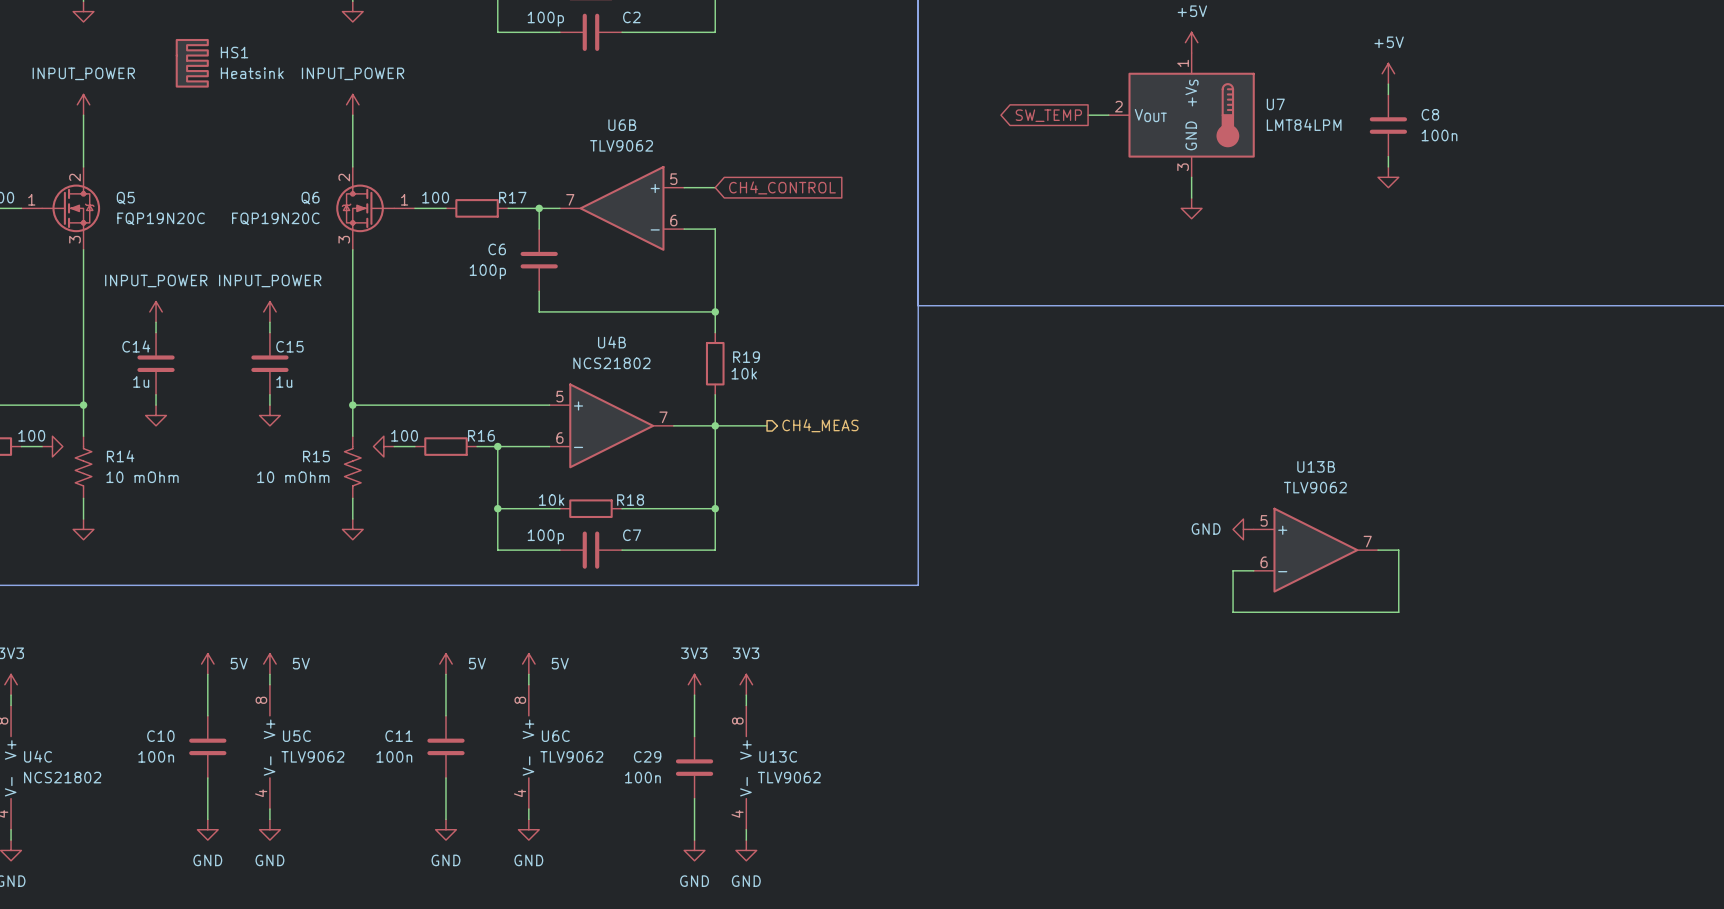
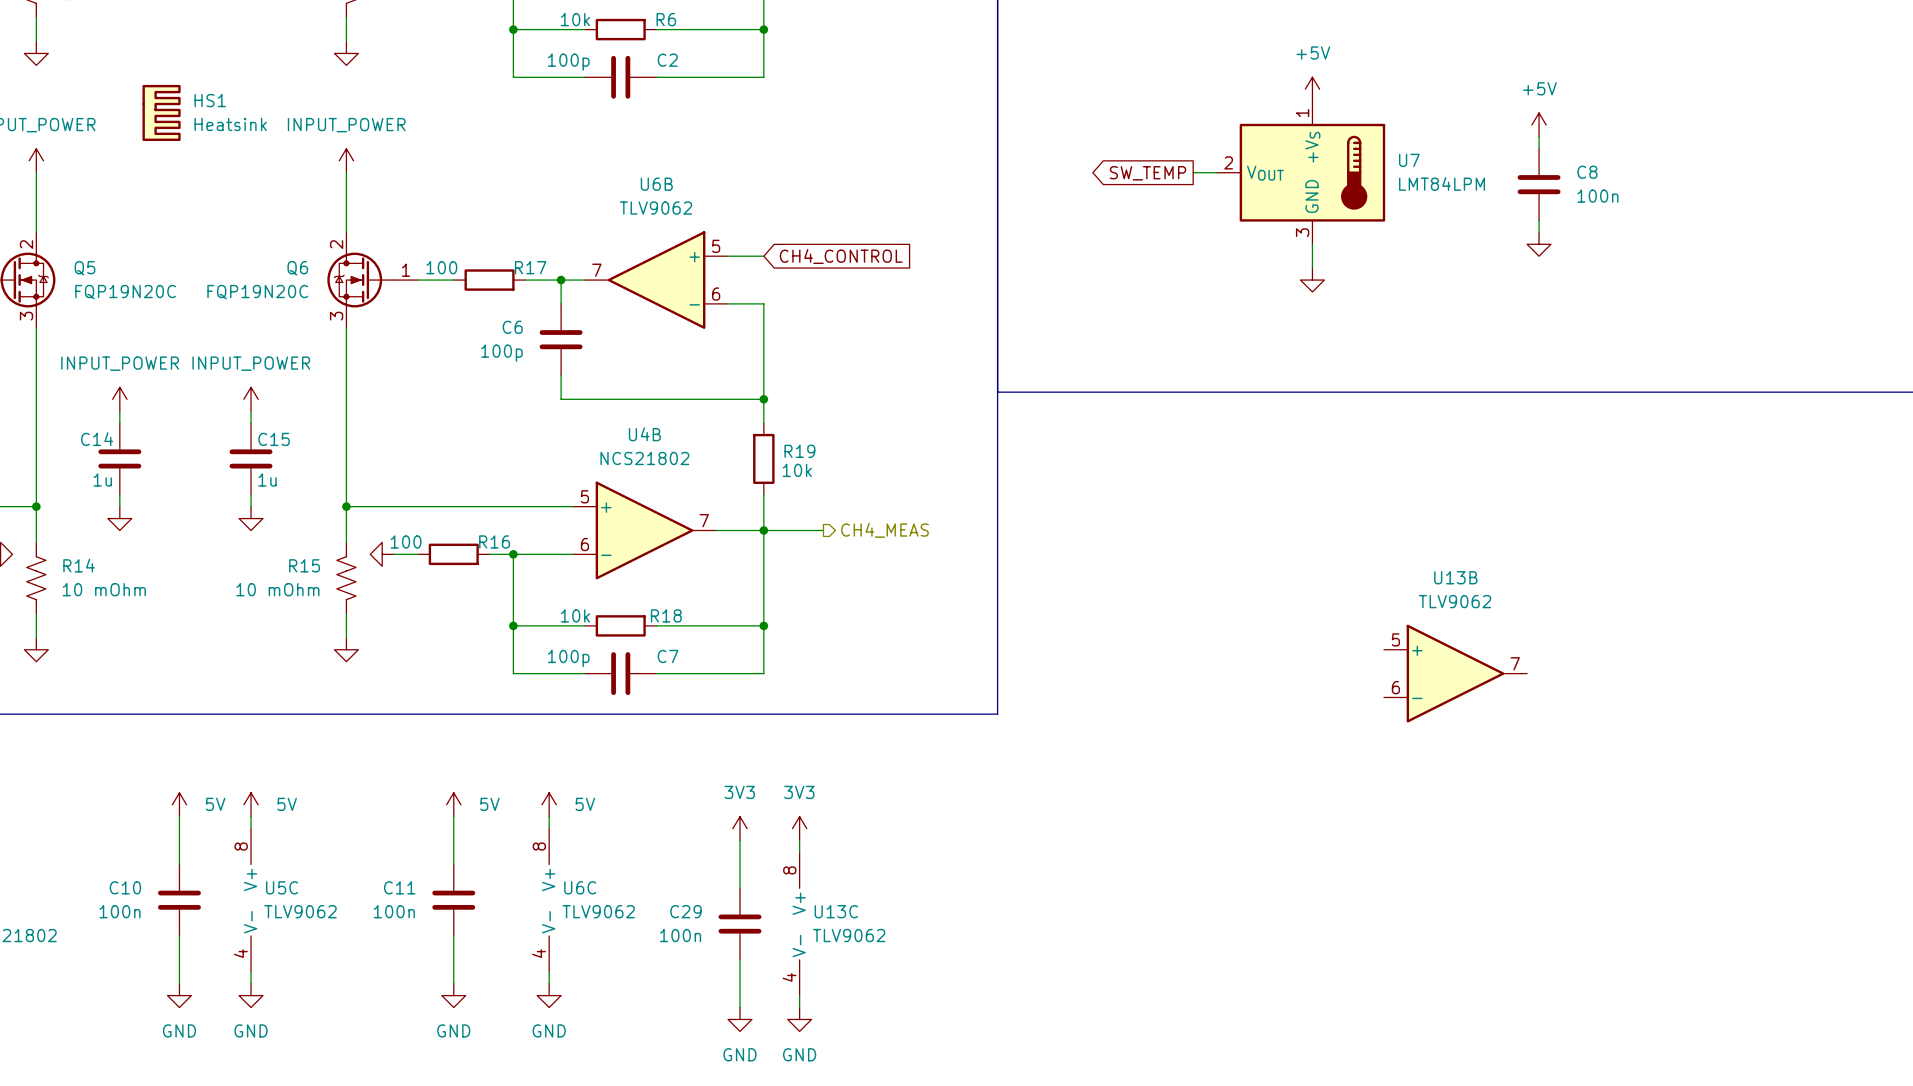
power symbol: GND (1243, 529) -> none
wire: (1378, 550) (1398, 550) (1398, 612) (1233, 612) (1233, 570) (1253, 570) -> none

